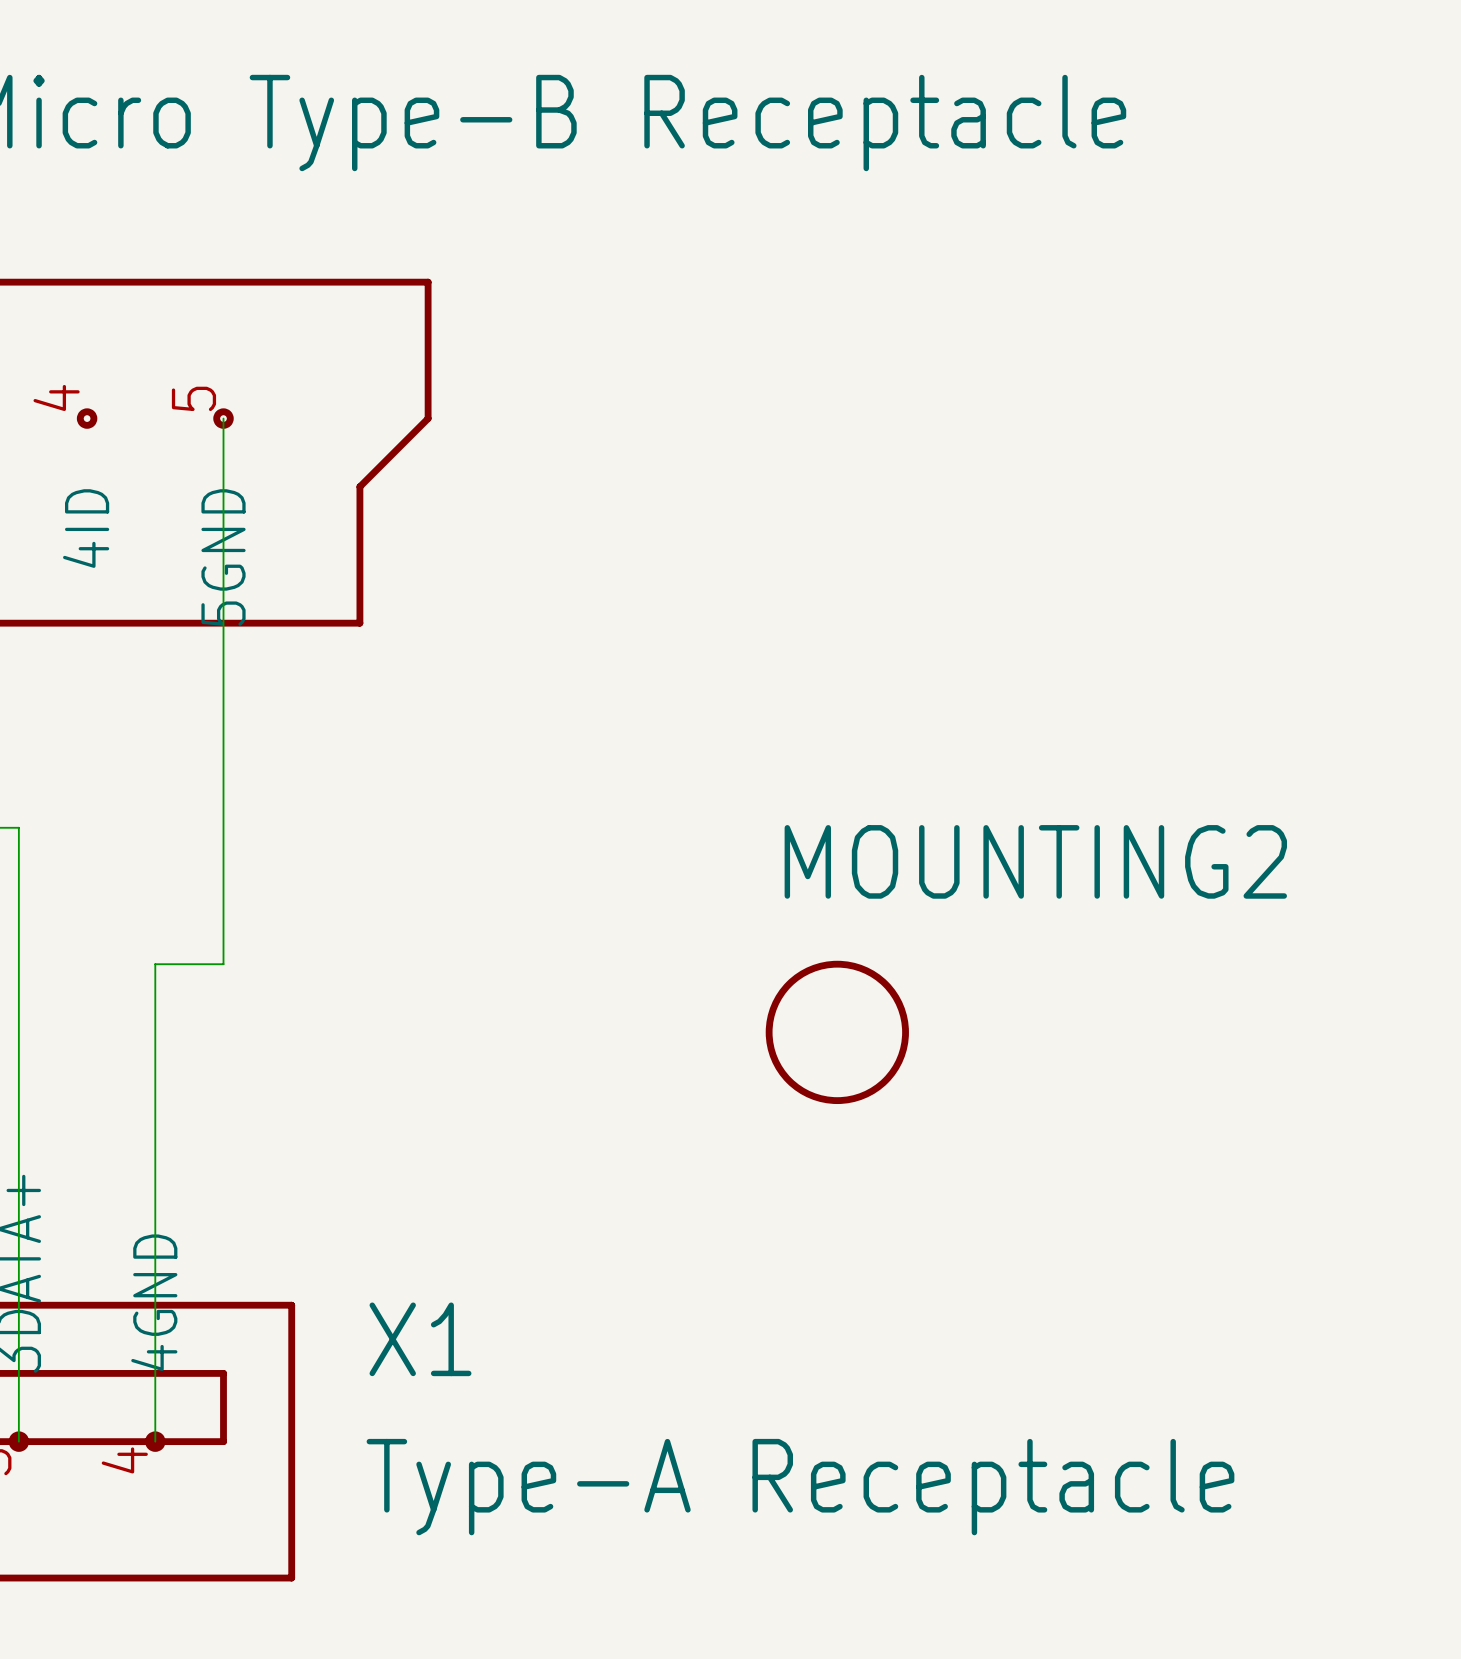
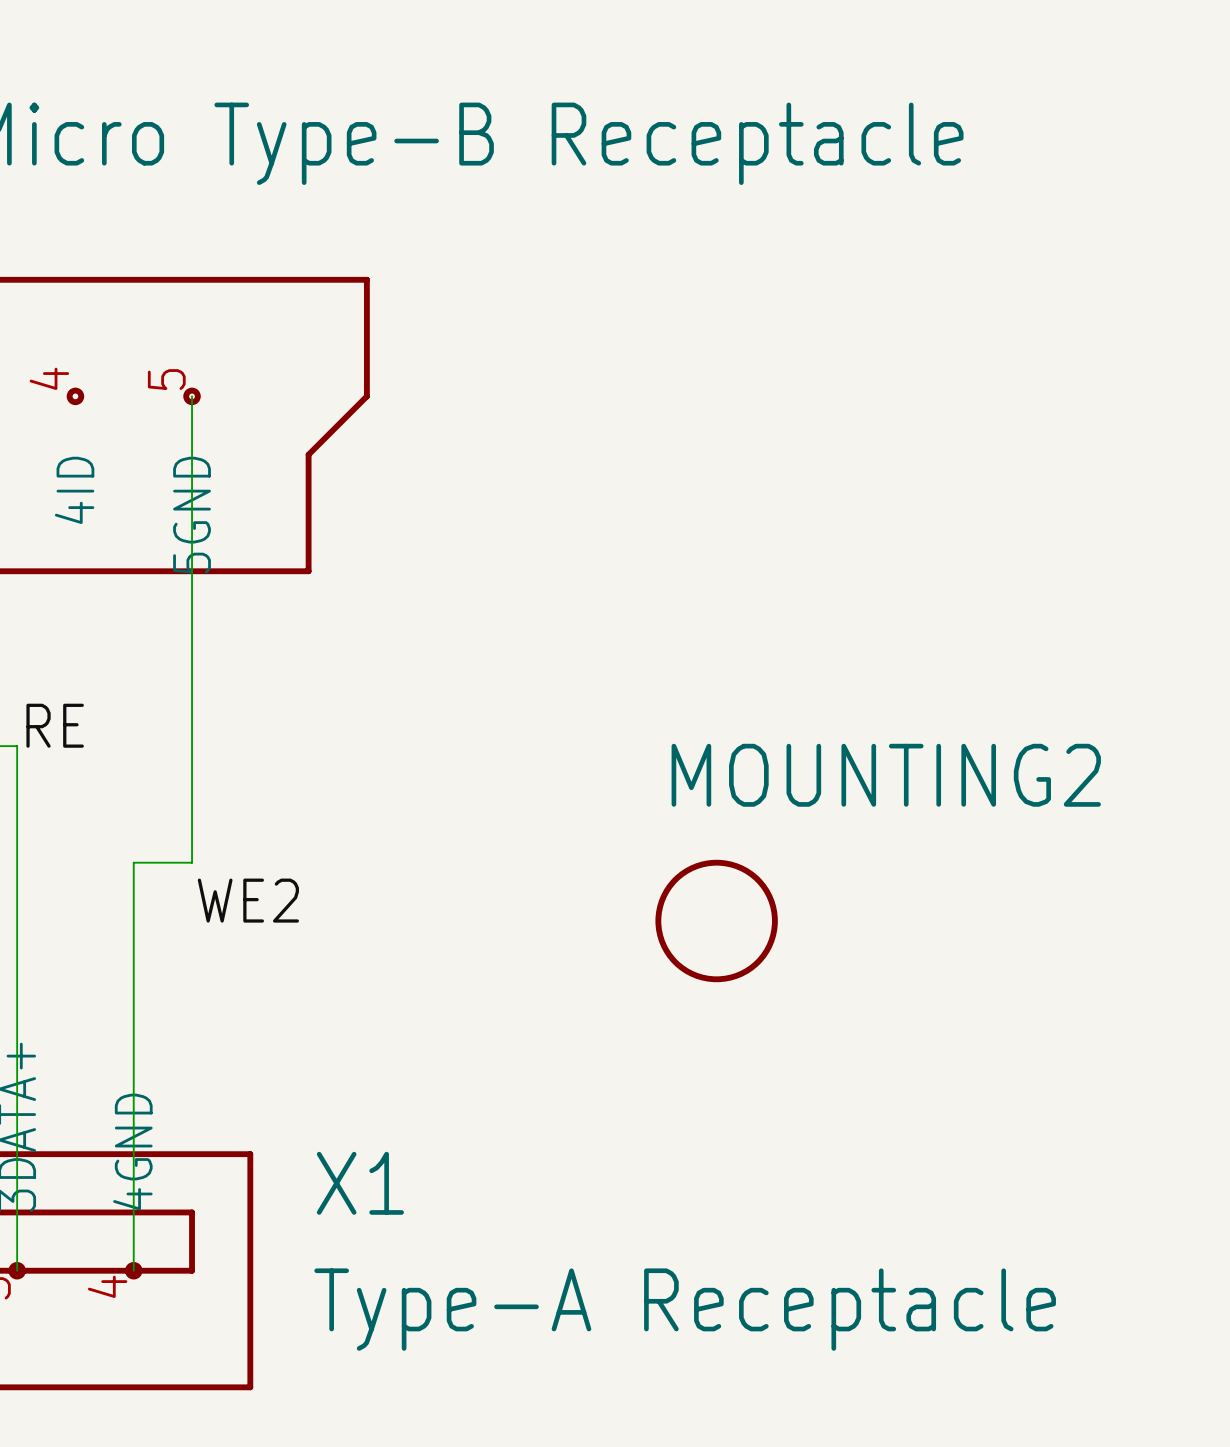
label: none -> RE (55, 725)
label: none -> WE2 (248, 900)

